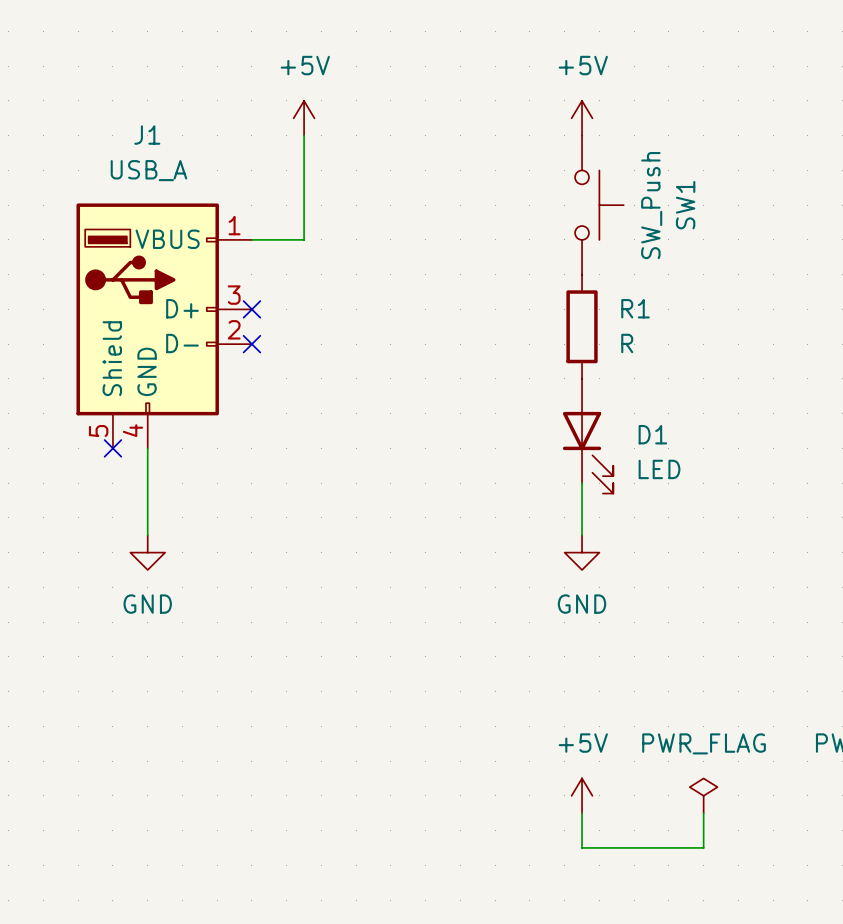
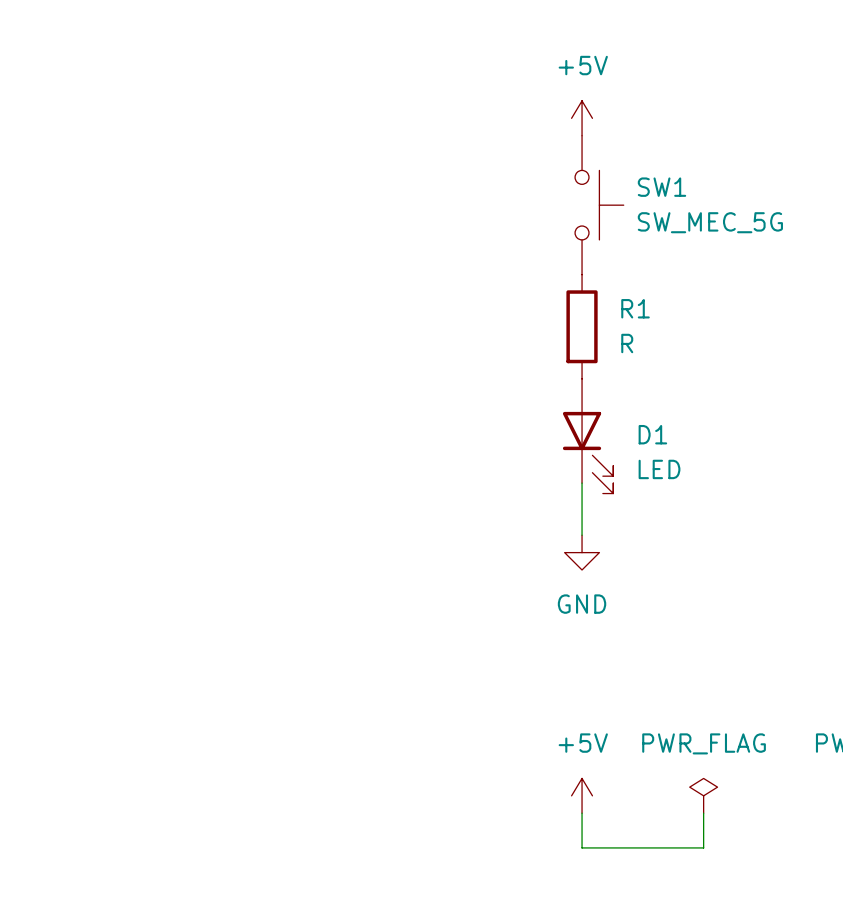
power symbol: +5V (304, 118) -> none
wire: (304, 135) (304, 239) (251, 239) -> none
SW1 value: SW_Push (651, 205) -> SW_MEC_5G (710, 222)
SW1 name rotation: 0° (685, 205) -> 90° clockwise (661, 187)
no-connect mark: (251, 309) -> none
J1: USB_A (164, 325) -> none
no-connect mark: (251, 344) -> none
no-connect mark: (112, 448) -> none
wire: (147, 448) (147, 535) -> none
power symbol: GND (147, 552) -> none

